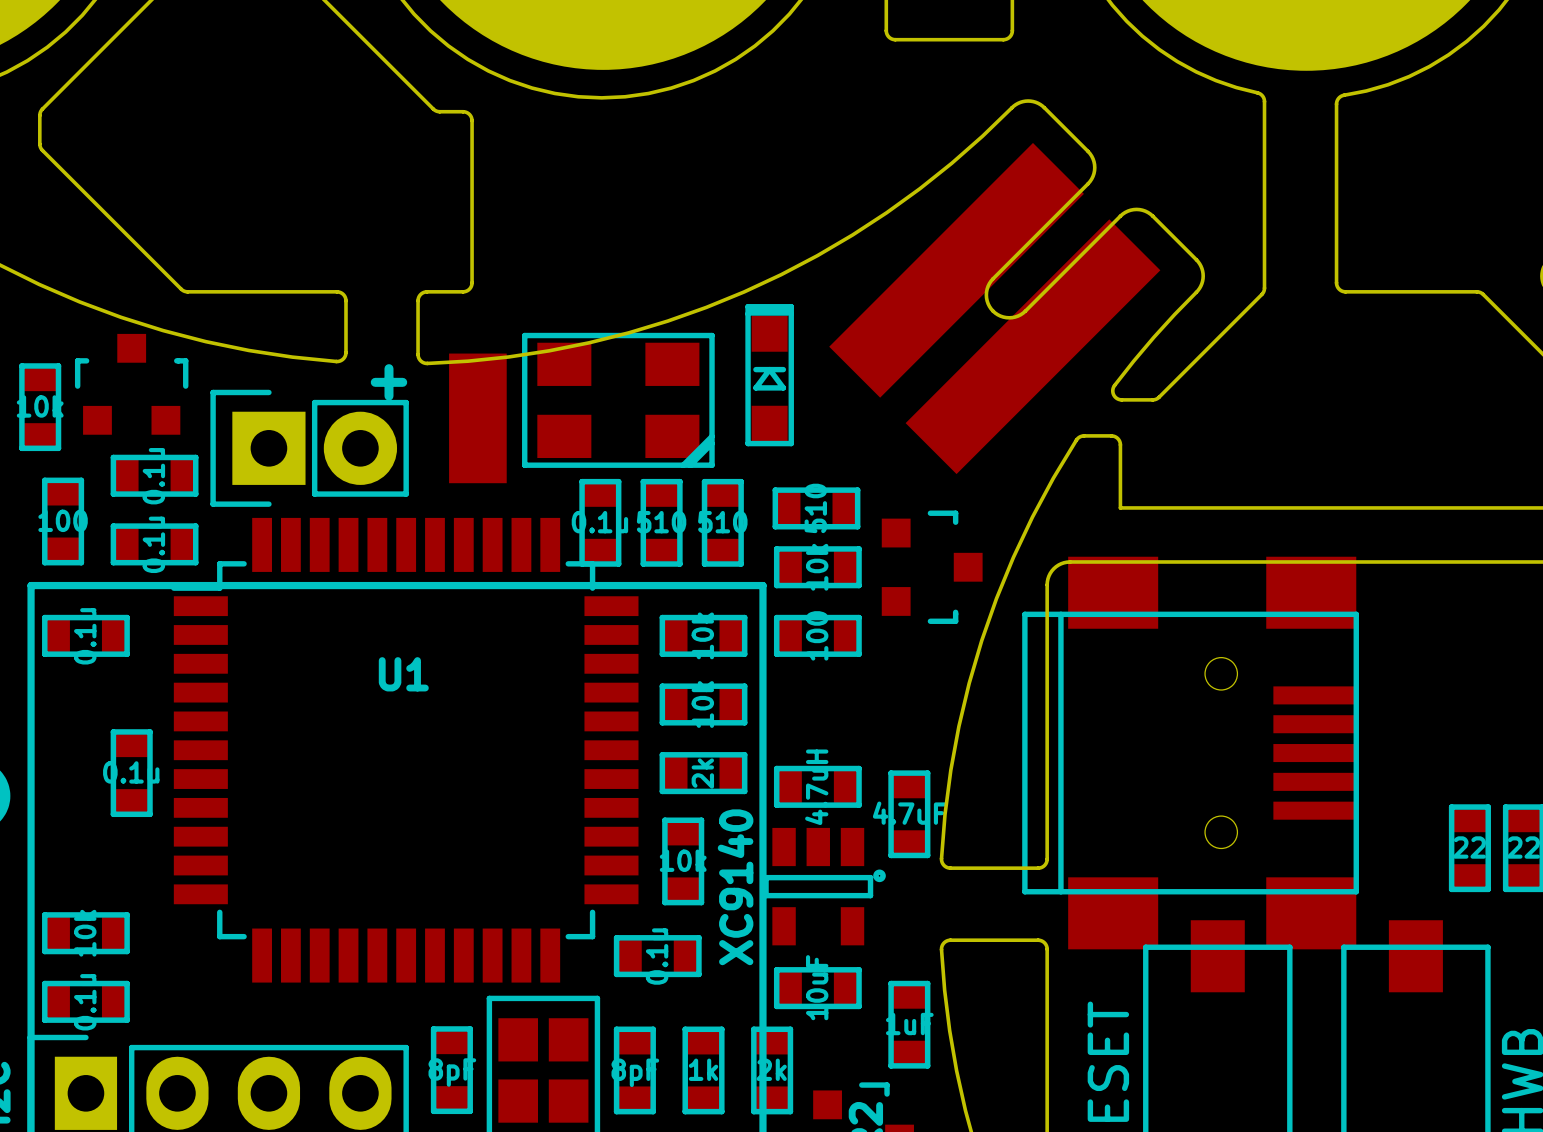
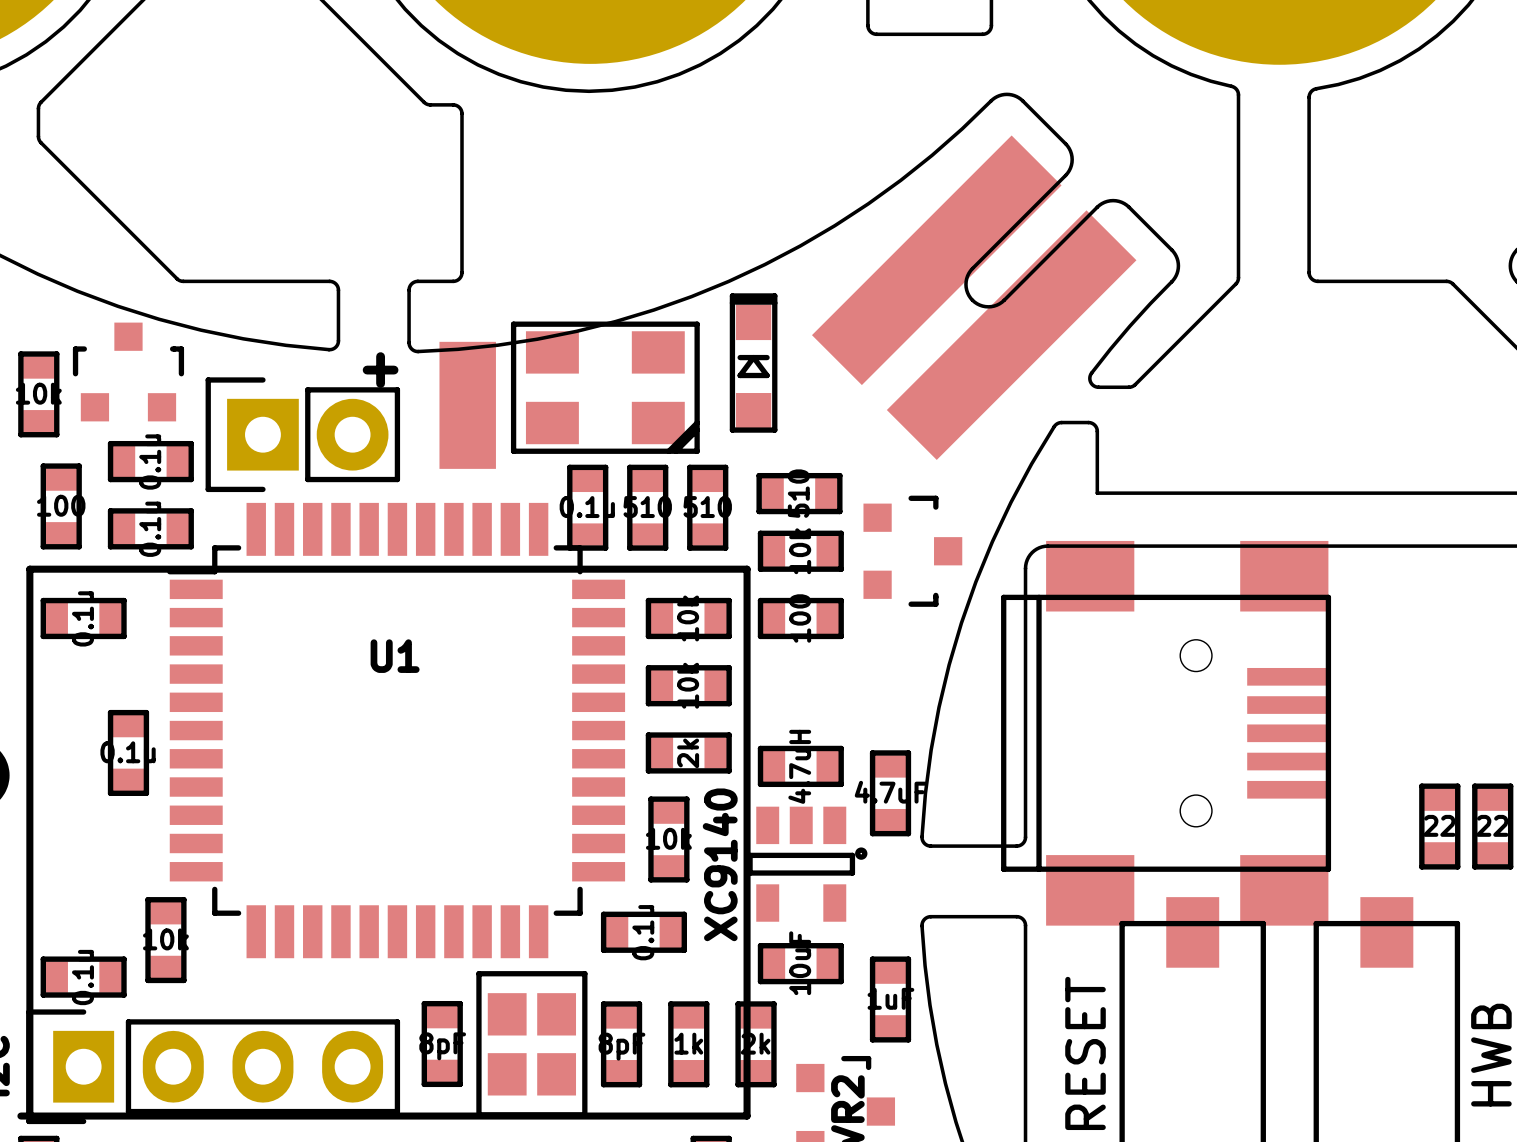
part rotation: 0° (85, 933) -> 90° clockwise (165, 940)
part position: (85, 933) -> (165, 940)

